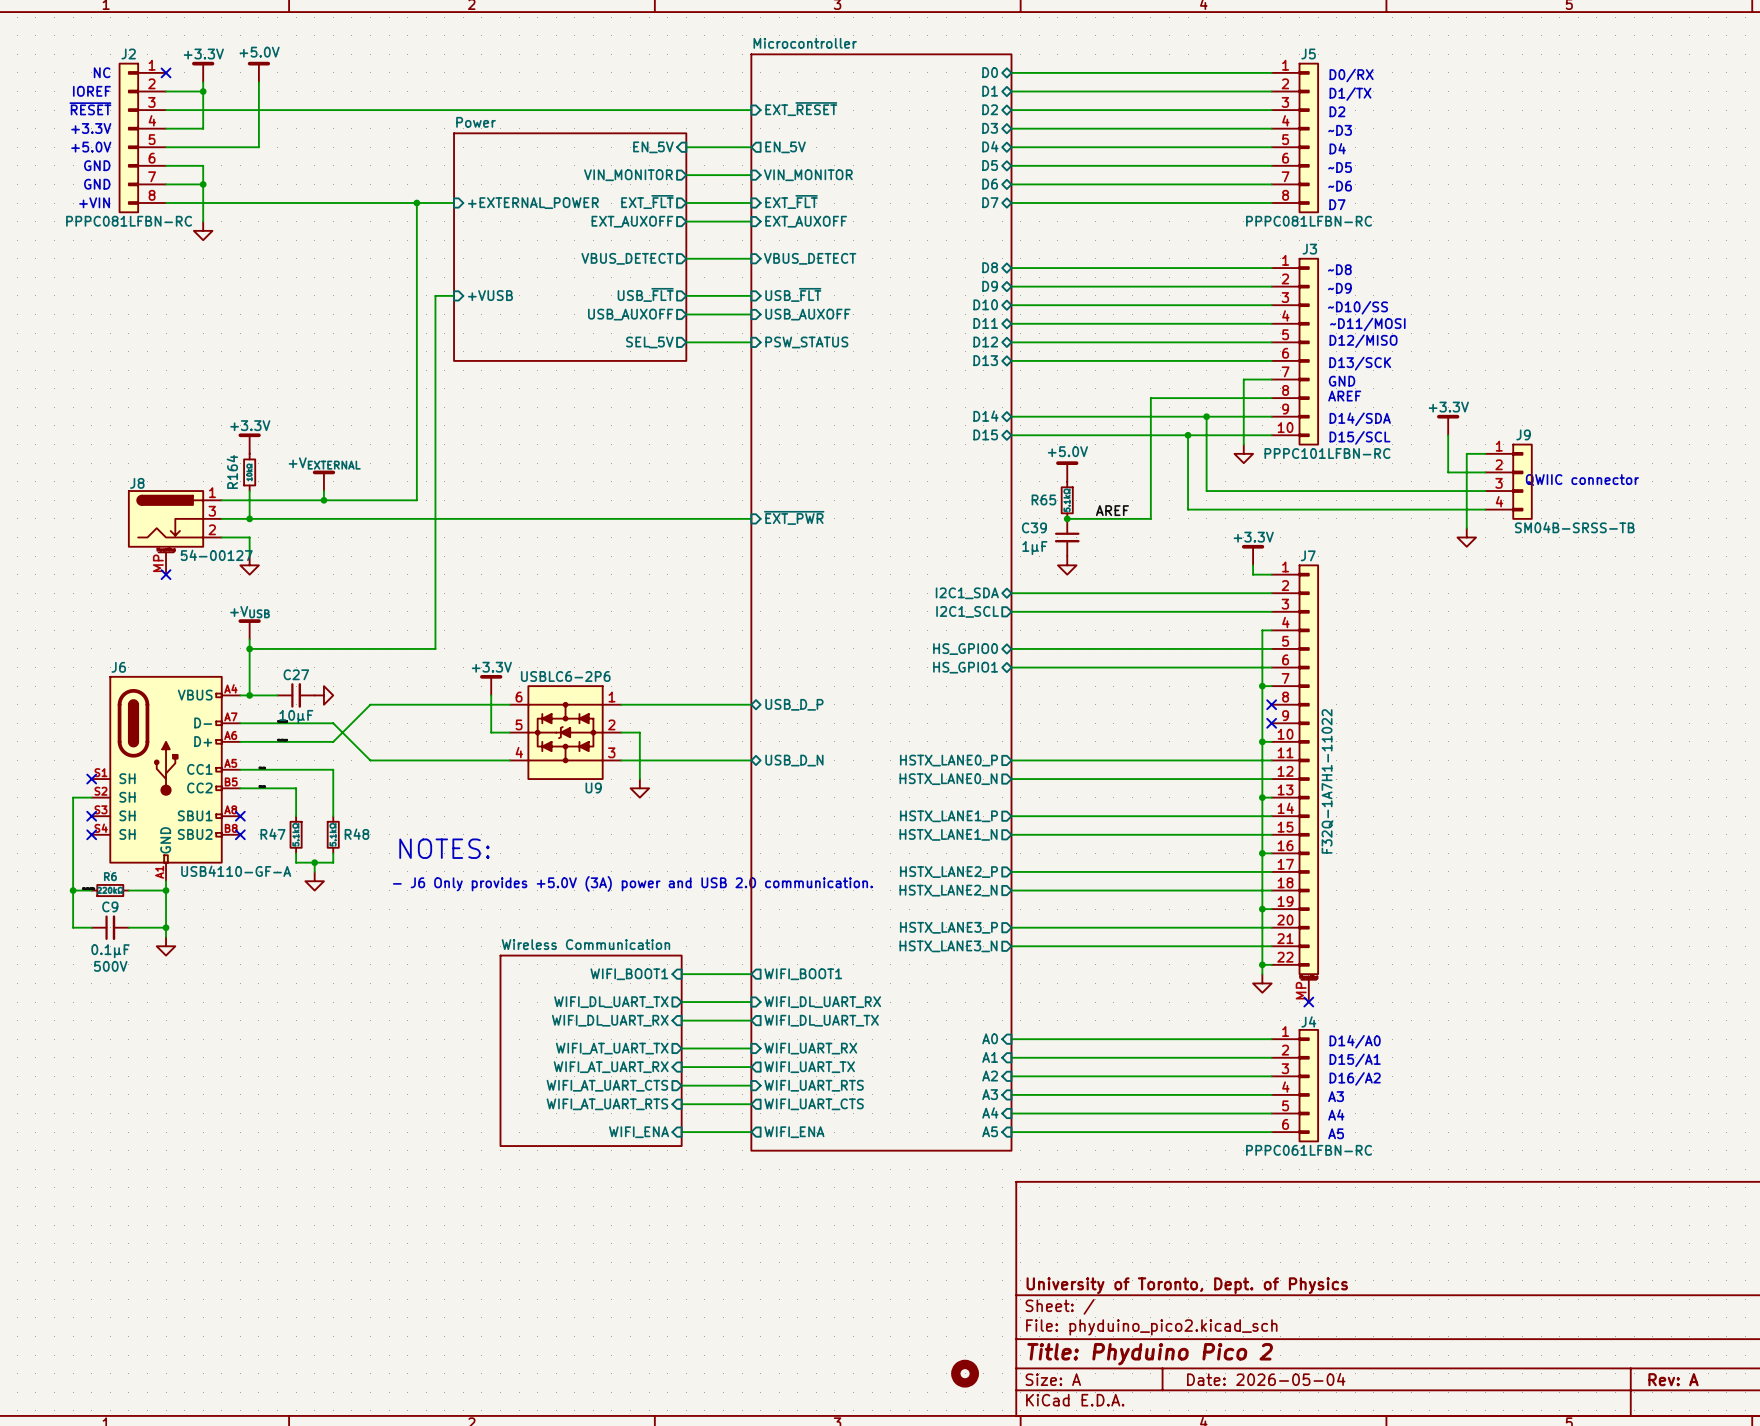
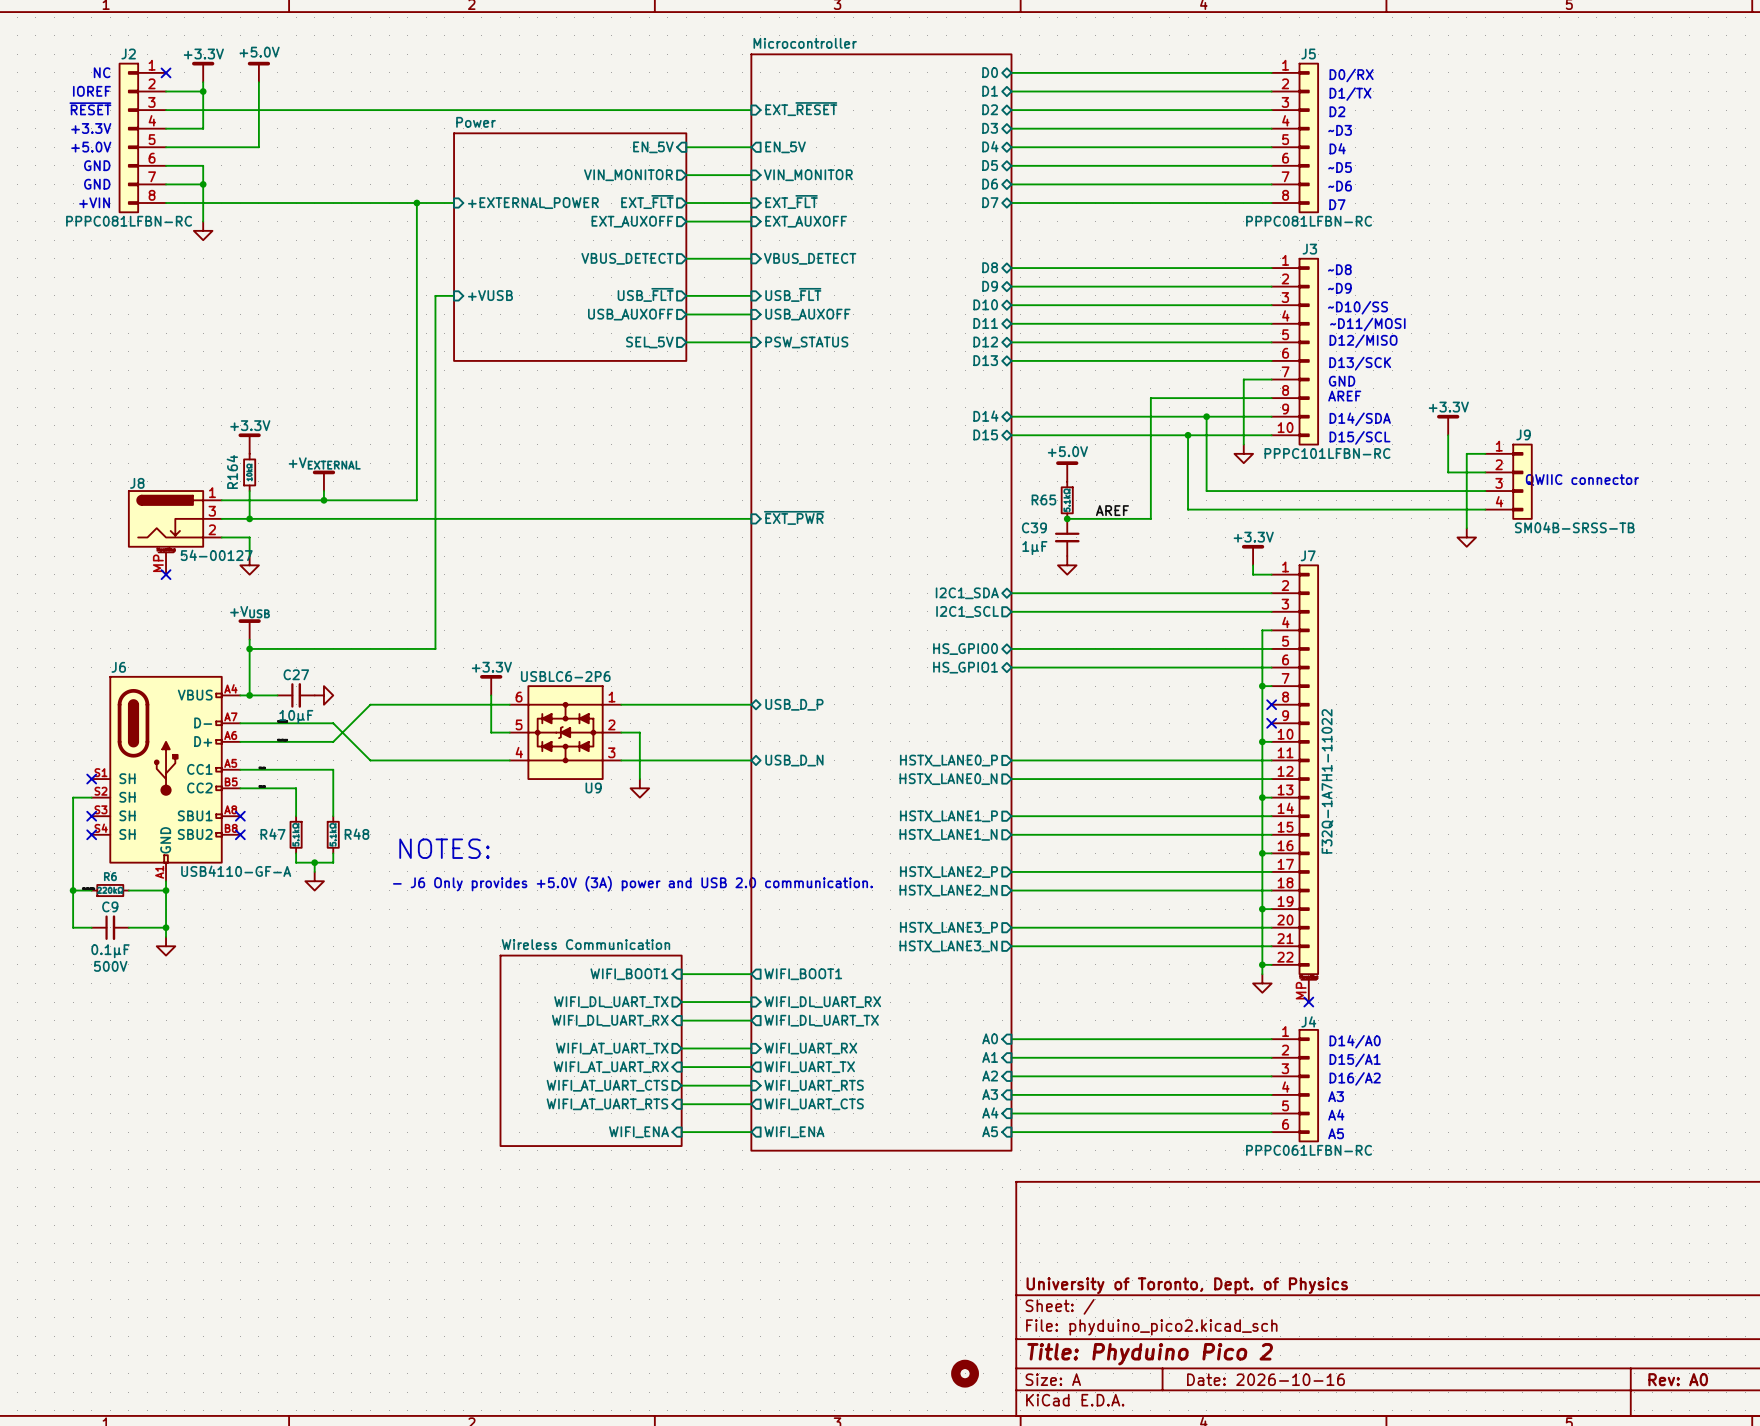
title block: Date: 2026-05-04 (1266, 1379) -> Date: 2026-10-16 (1265, 1379)
title block: Rev: A (1673, 1379) -> Rev: A0 (1678, 1379)

